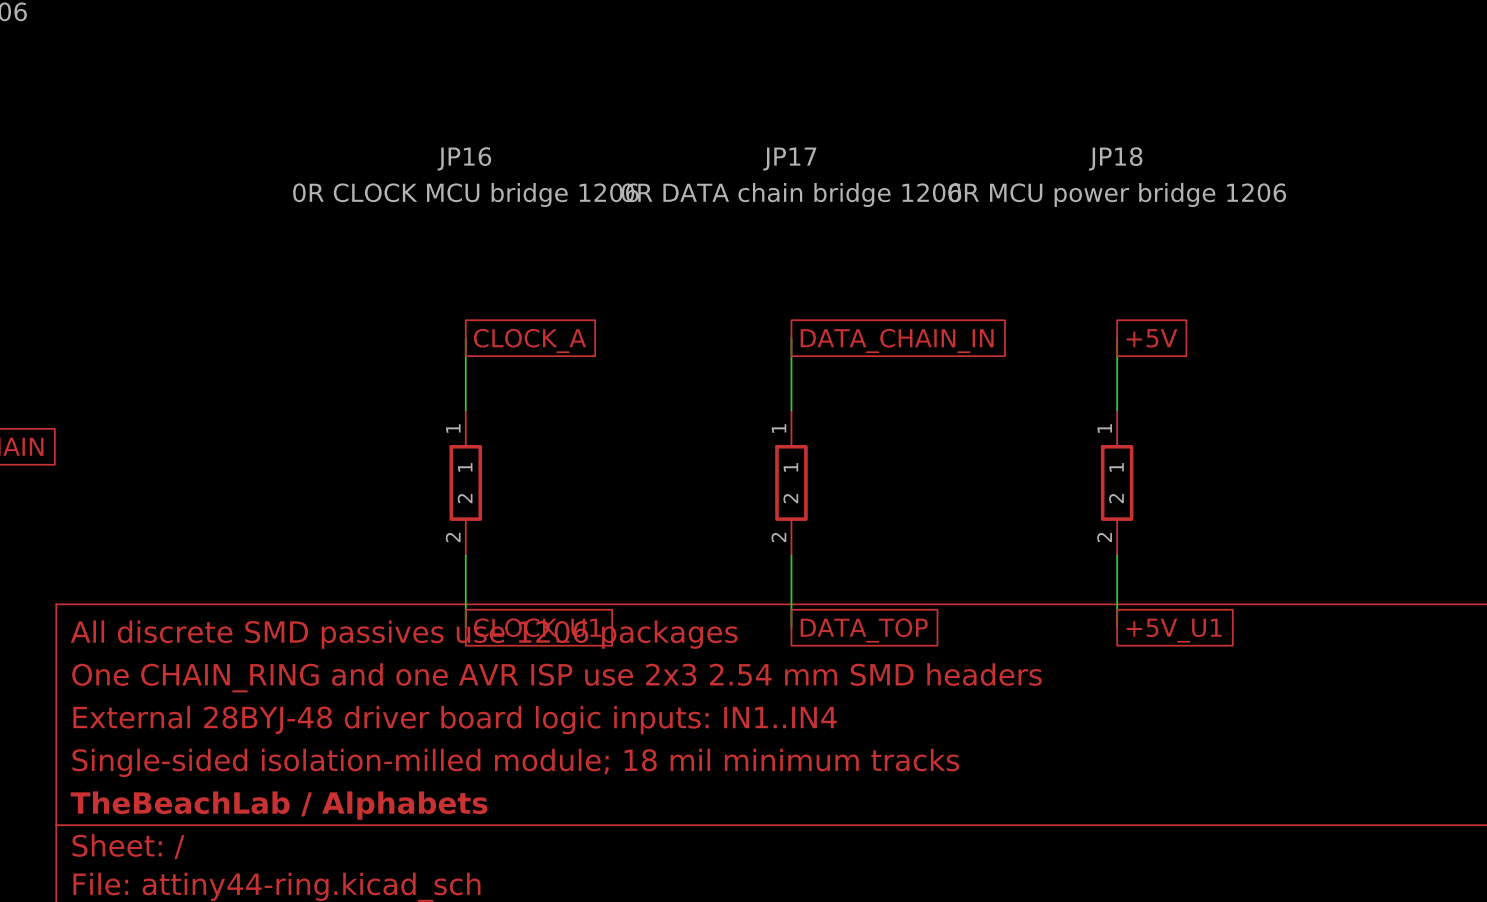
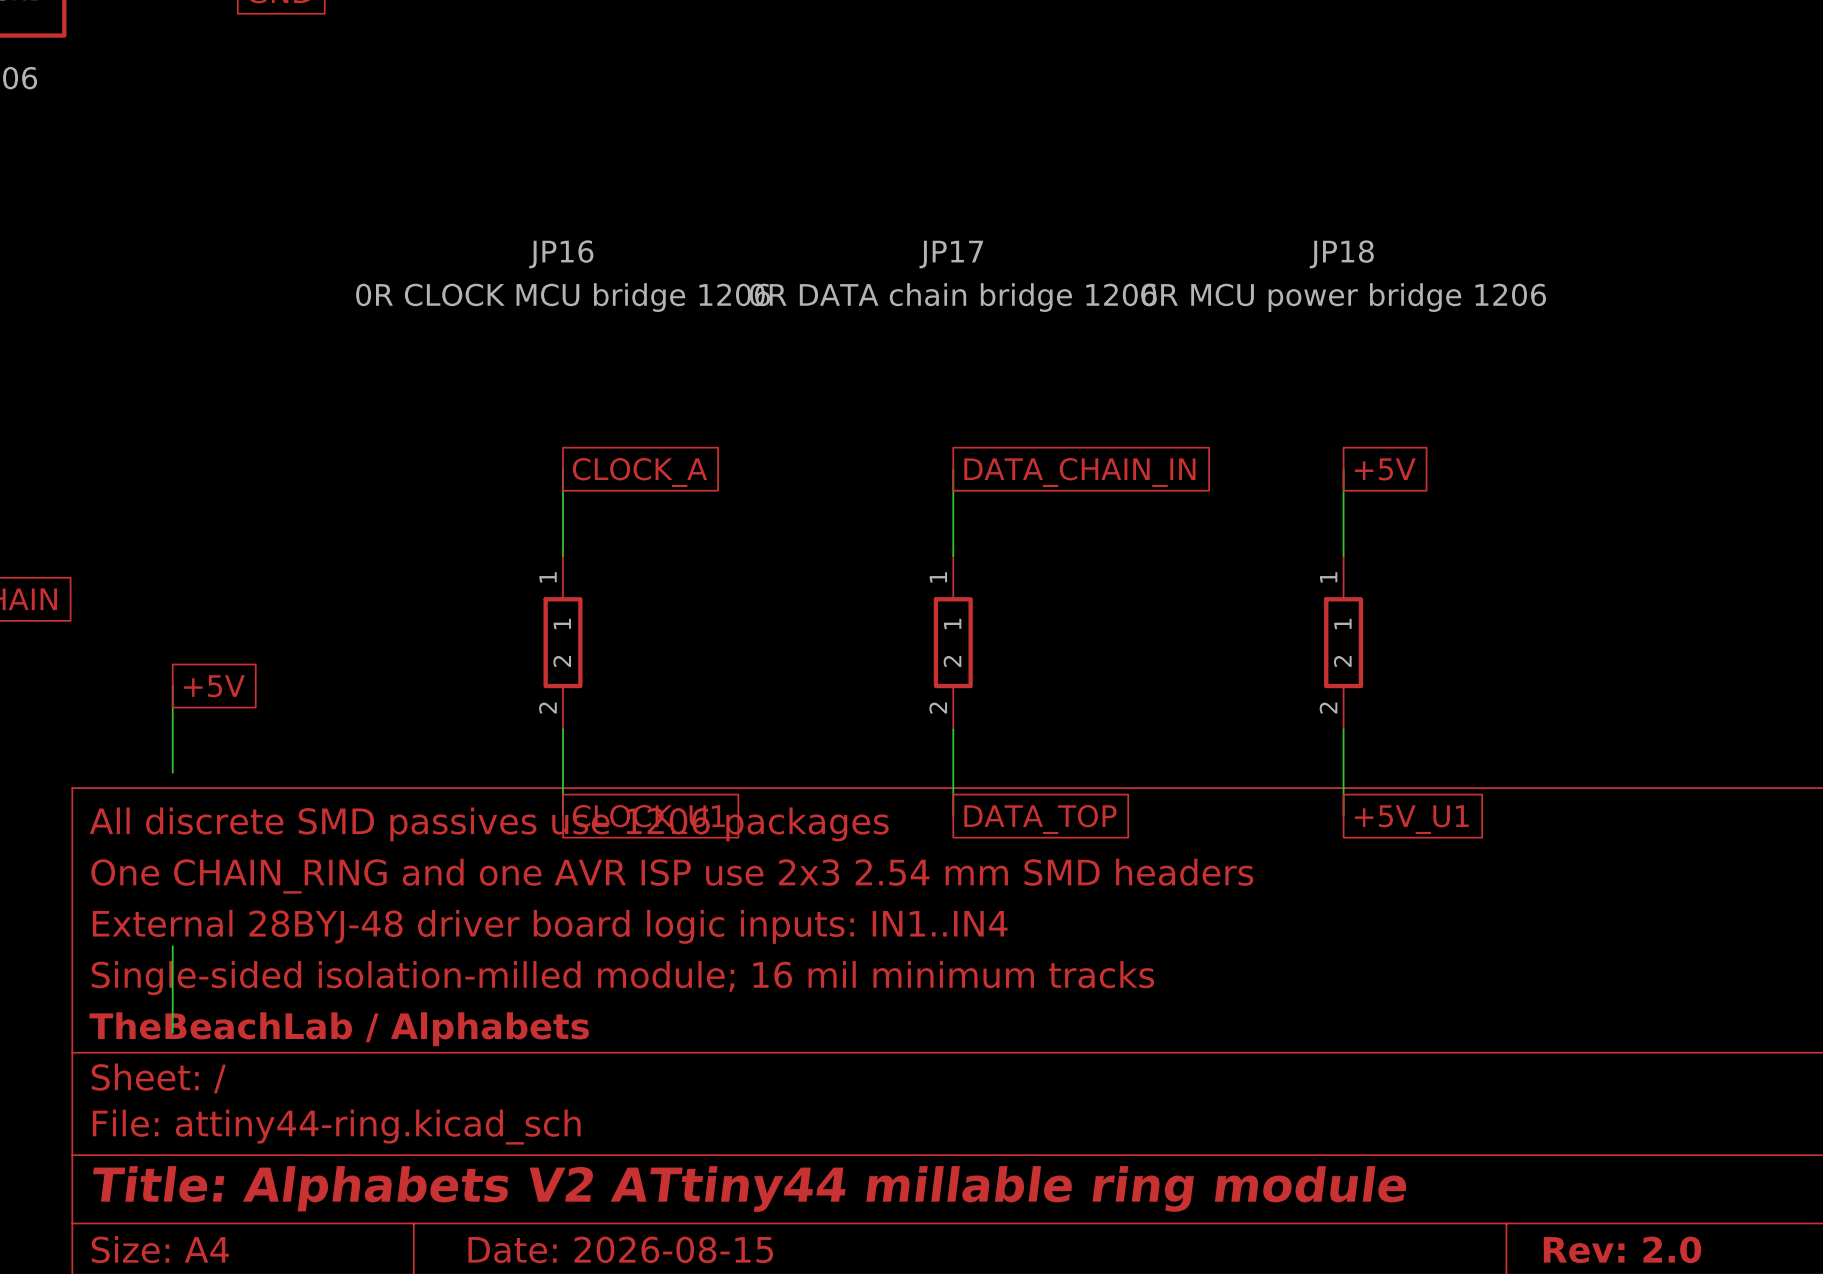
wire: none -> (172, 686) (172, 772)
global label: none -> +5V (214, 686)
wire: none -> (172, 946) (172, 1032)
title block: Single-sided isolation-milled module; 18 mil minimum tracks (515, 762) -> Single-sided isolation-milled module; 16 mil minimum tracks (622, 978)

